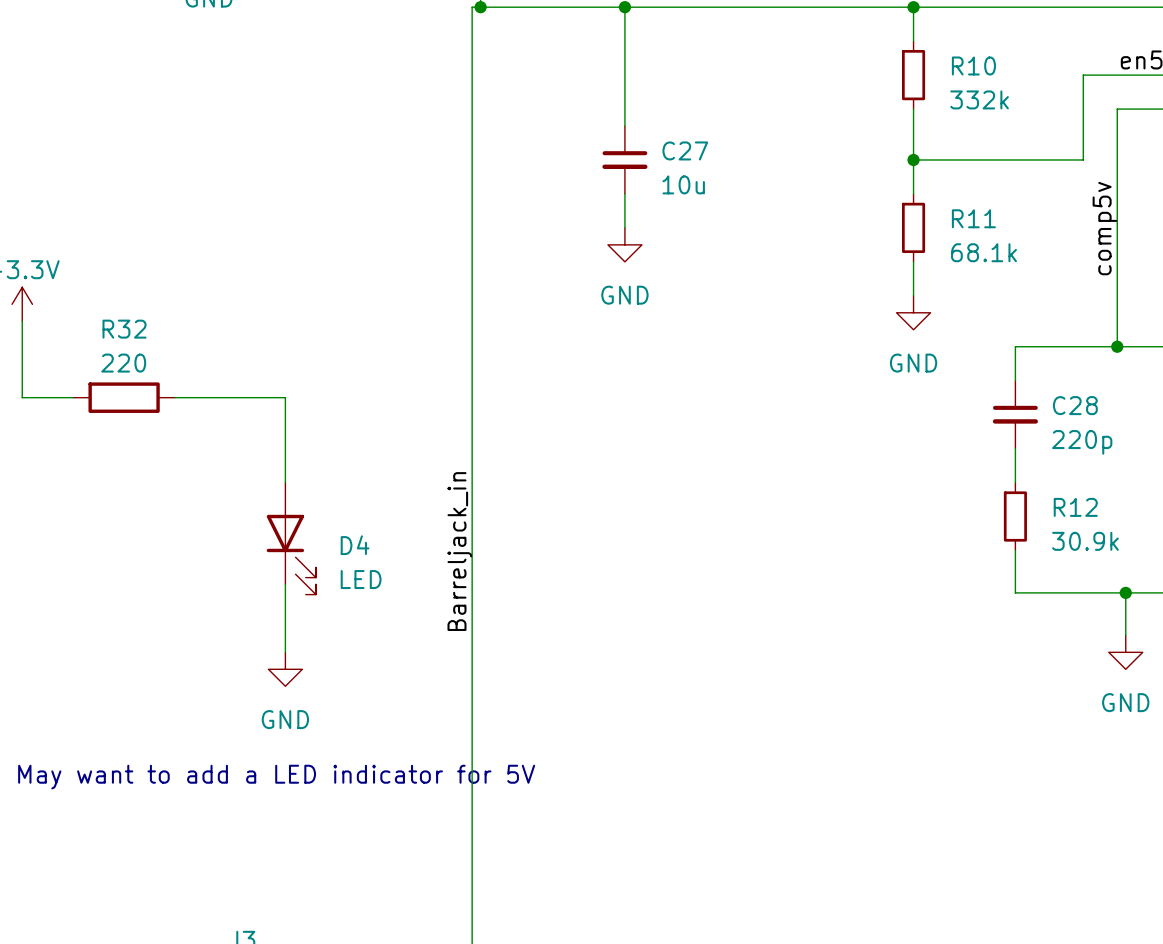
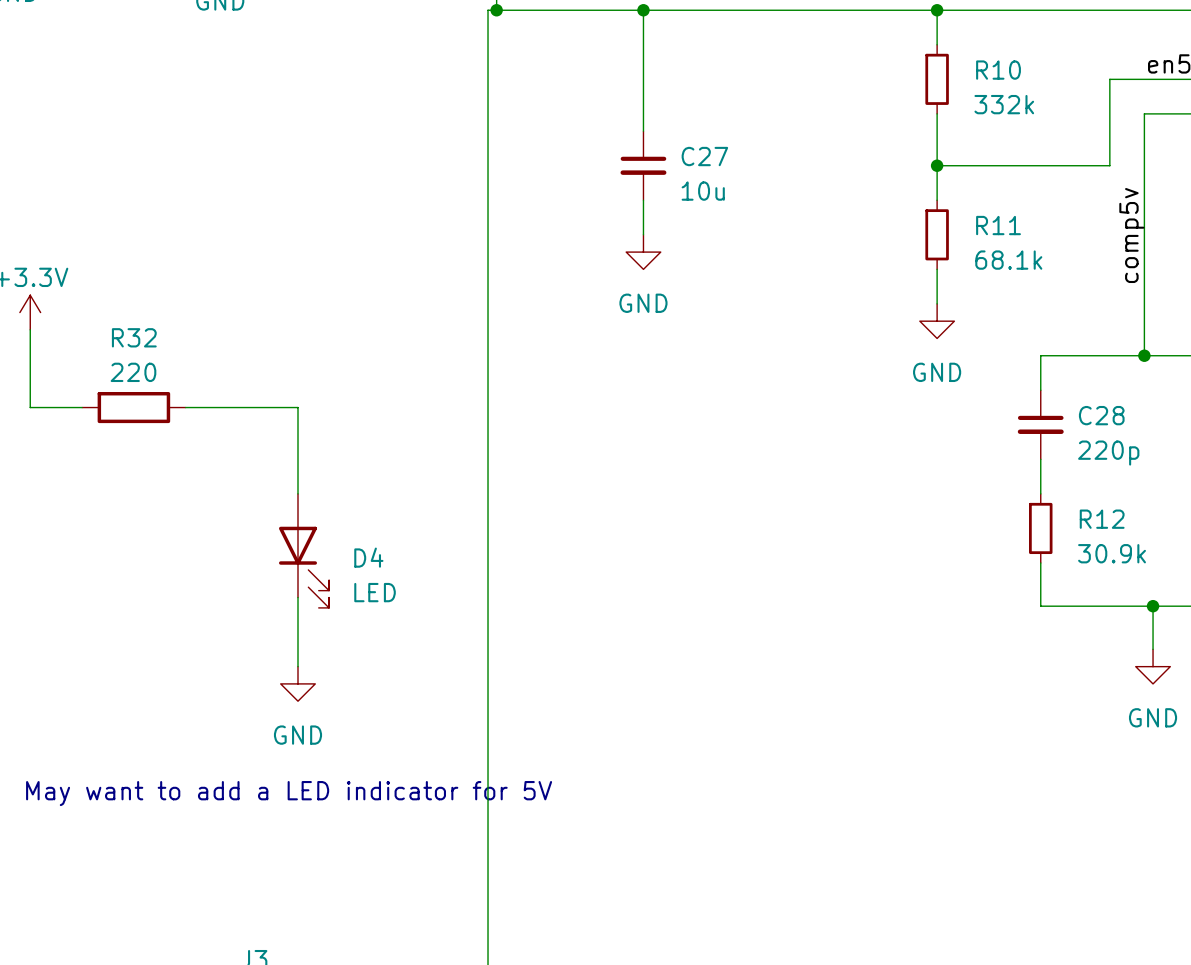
label: Barreljack_in (459, 551) -> none

